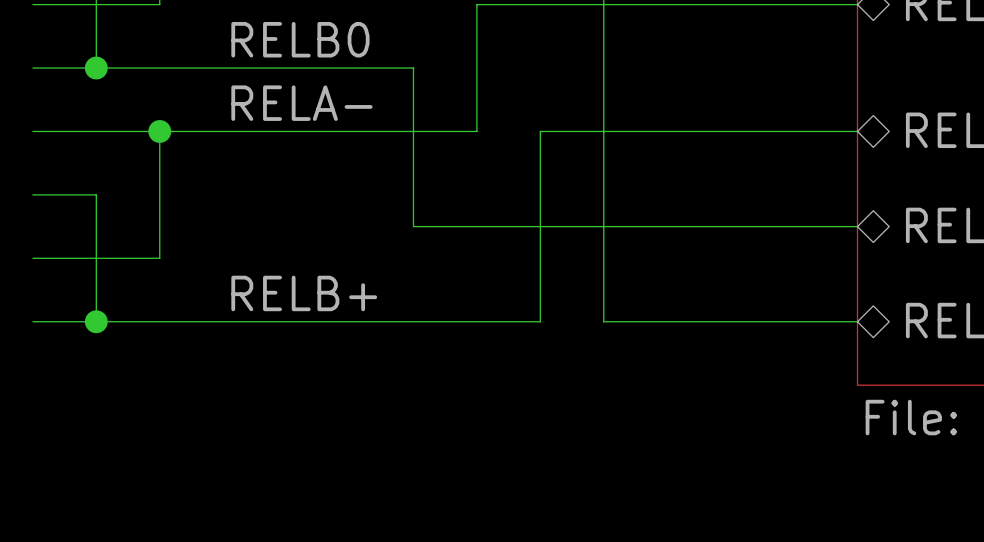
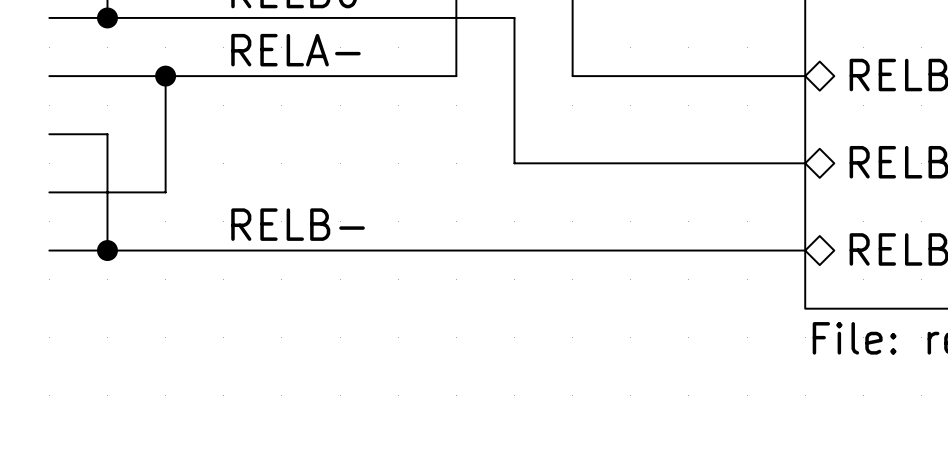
wire: (413, 68) (413, 226) (540, 226) (540, 321) -> (398, 17) (514, 17) (514, 76)
wire: (540, 131) (603, 131) (603, 321) -> (514, 250) (572, 250)
label: RELB+ (304, 293) -> RELB- (298, 224)

